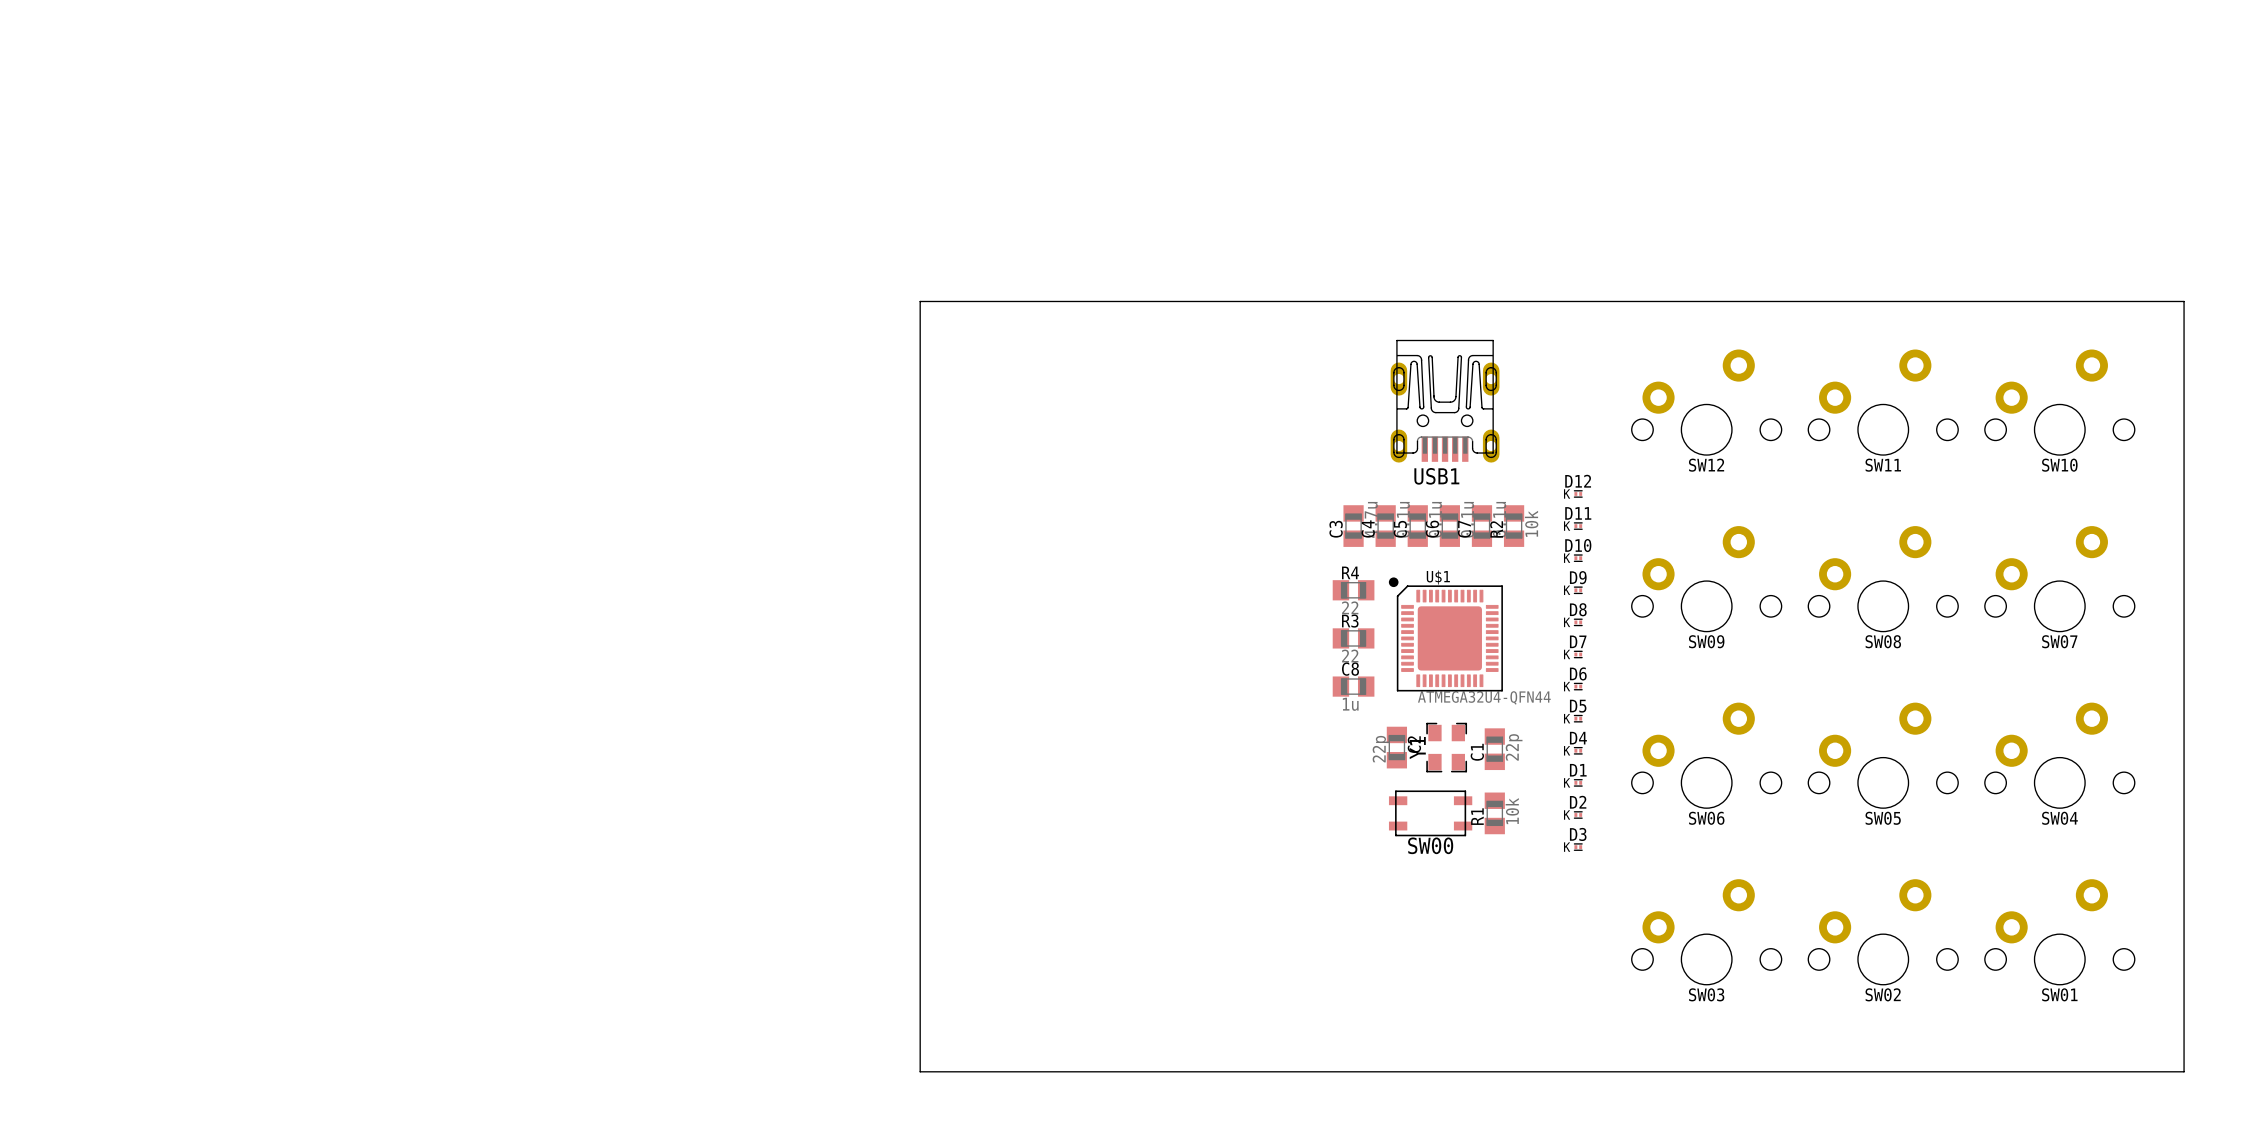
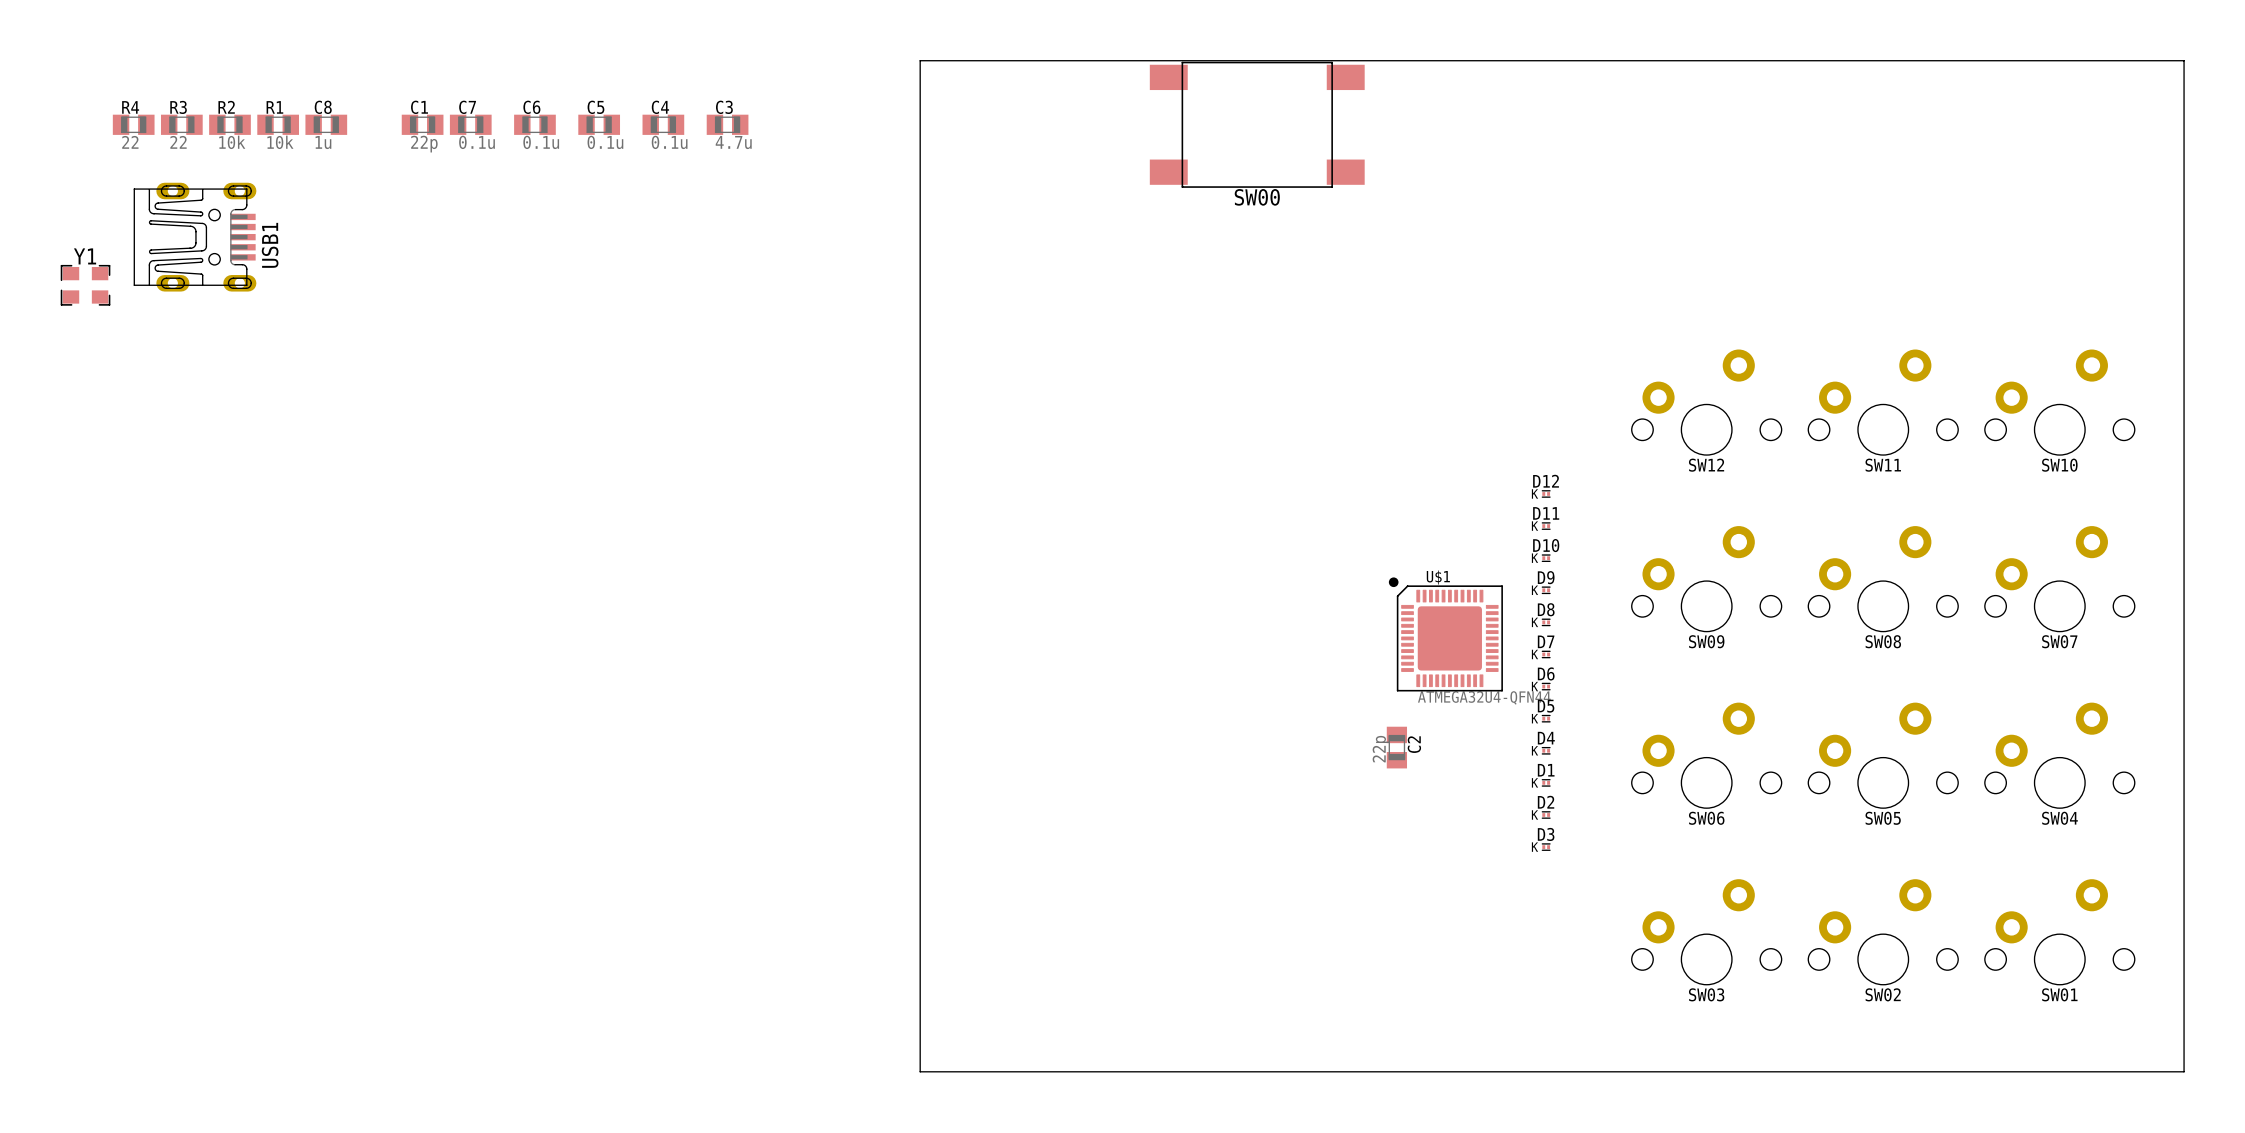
board edge: (920, 301) (2184, 301) -> (920, 301) (920, 60) (2184, 60) (2184, 301)
USB1 rotation: 0° (1445, 401) -> 90° counterclockwise (195, 237)
USB1 position: (1445, 401) -> (195, 237)
D12 position: (1578, 493) -> (1546, 493)
C3 rotation: 0° (1353, 526) -> 90° clockwise (727, 124)
C3 position: (1353, 526) -> (727, 124)
C4 rotation: 0° (1385, 526) -> 90° clockwise (663, 124)
C4 position: (1385, 526) -> (663, 124)
C5 rotation: 0° (1417, 526) -> 90° clockwise (599, 124)
C5 position: (1417, 526) -> (599, 124)
C6 rotation: 0° (1449, 526) -> 90° clockwise (534, 124)
C6 position: (1449, 526) -> (534, 124)
C7 rotation: 0° (1481, 526) -> 90° clockwise (470, 124)
C7 position: (1481, 526) -> (470, 124)
R2 rotation: 0° (1514, 526) -> 90° clockwise (229, 124)
R2 position: (1514, 526) -> (229, 124)
D11 position: (1578, 526) -> (1546, 526)
D10 position: (1578, 558) -> (1546, 558)
R4 position: (1353, 590) -> (133, 124)
D9 position: (1578, 590) -> (1546, 590)
D8 position: (1578, 622) -> (1546, 622)
R3 position: (1353, 638) -> (181, 124)
D7 position: (1578, 654) -> (1546, 654)
C8 position: (1353, 686) -> (326, 124)
D6 position: (1578, 686) -> (1546, 686)
D5 position: (1578, 718) -> (1546, 718)
Y1 rotation: 0° (1446, 747) -> 90° clockwise (85, 285)
Y1 position: (1446, 747) -> (85, 285)
C1 rotation: 0° (1494, 749) -> 90° clockwise (422, 124)
C1 position: (1494, 749) -> (422, 124)
D4 position: (1578, 750) -> (1546, 750)
D1 position: (1578, 782) -> (1546, 782)
SW00 footprint: [1388, 790, 1473, 837] -> [1149, 61, 1365, 188]
R1 rotation: 0° (1494, 813) -> 90° clockwise (278, 124)
R1 position: (1494, 813) -> (278, 124)
D2 position: (1578, 814) -> (1546, 814)
SW00 name position: SW00 (1430, 845) -> SW00 (1257, 197)
D3 position: (1578, 847) -> (1546, 847)

